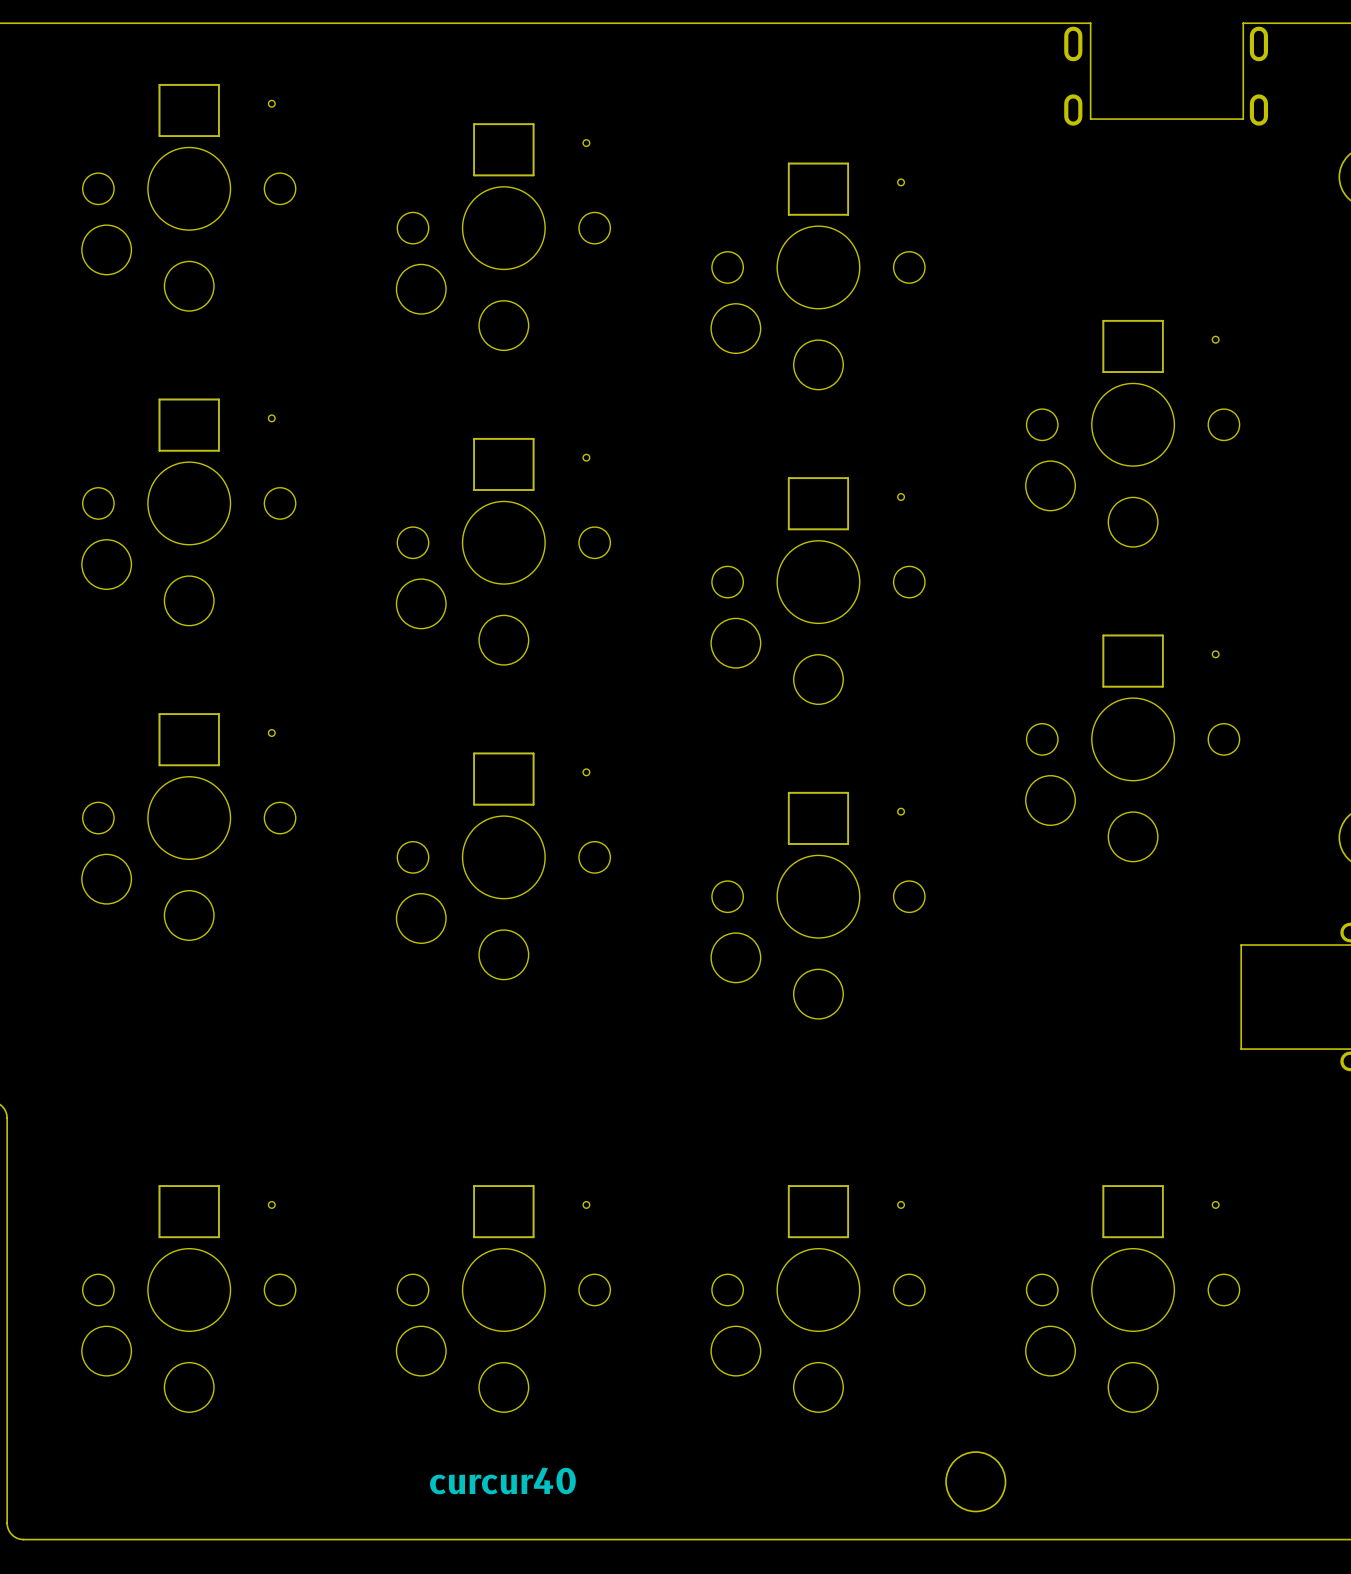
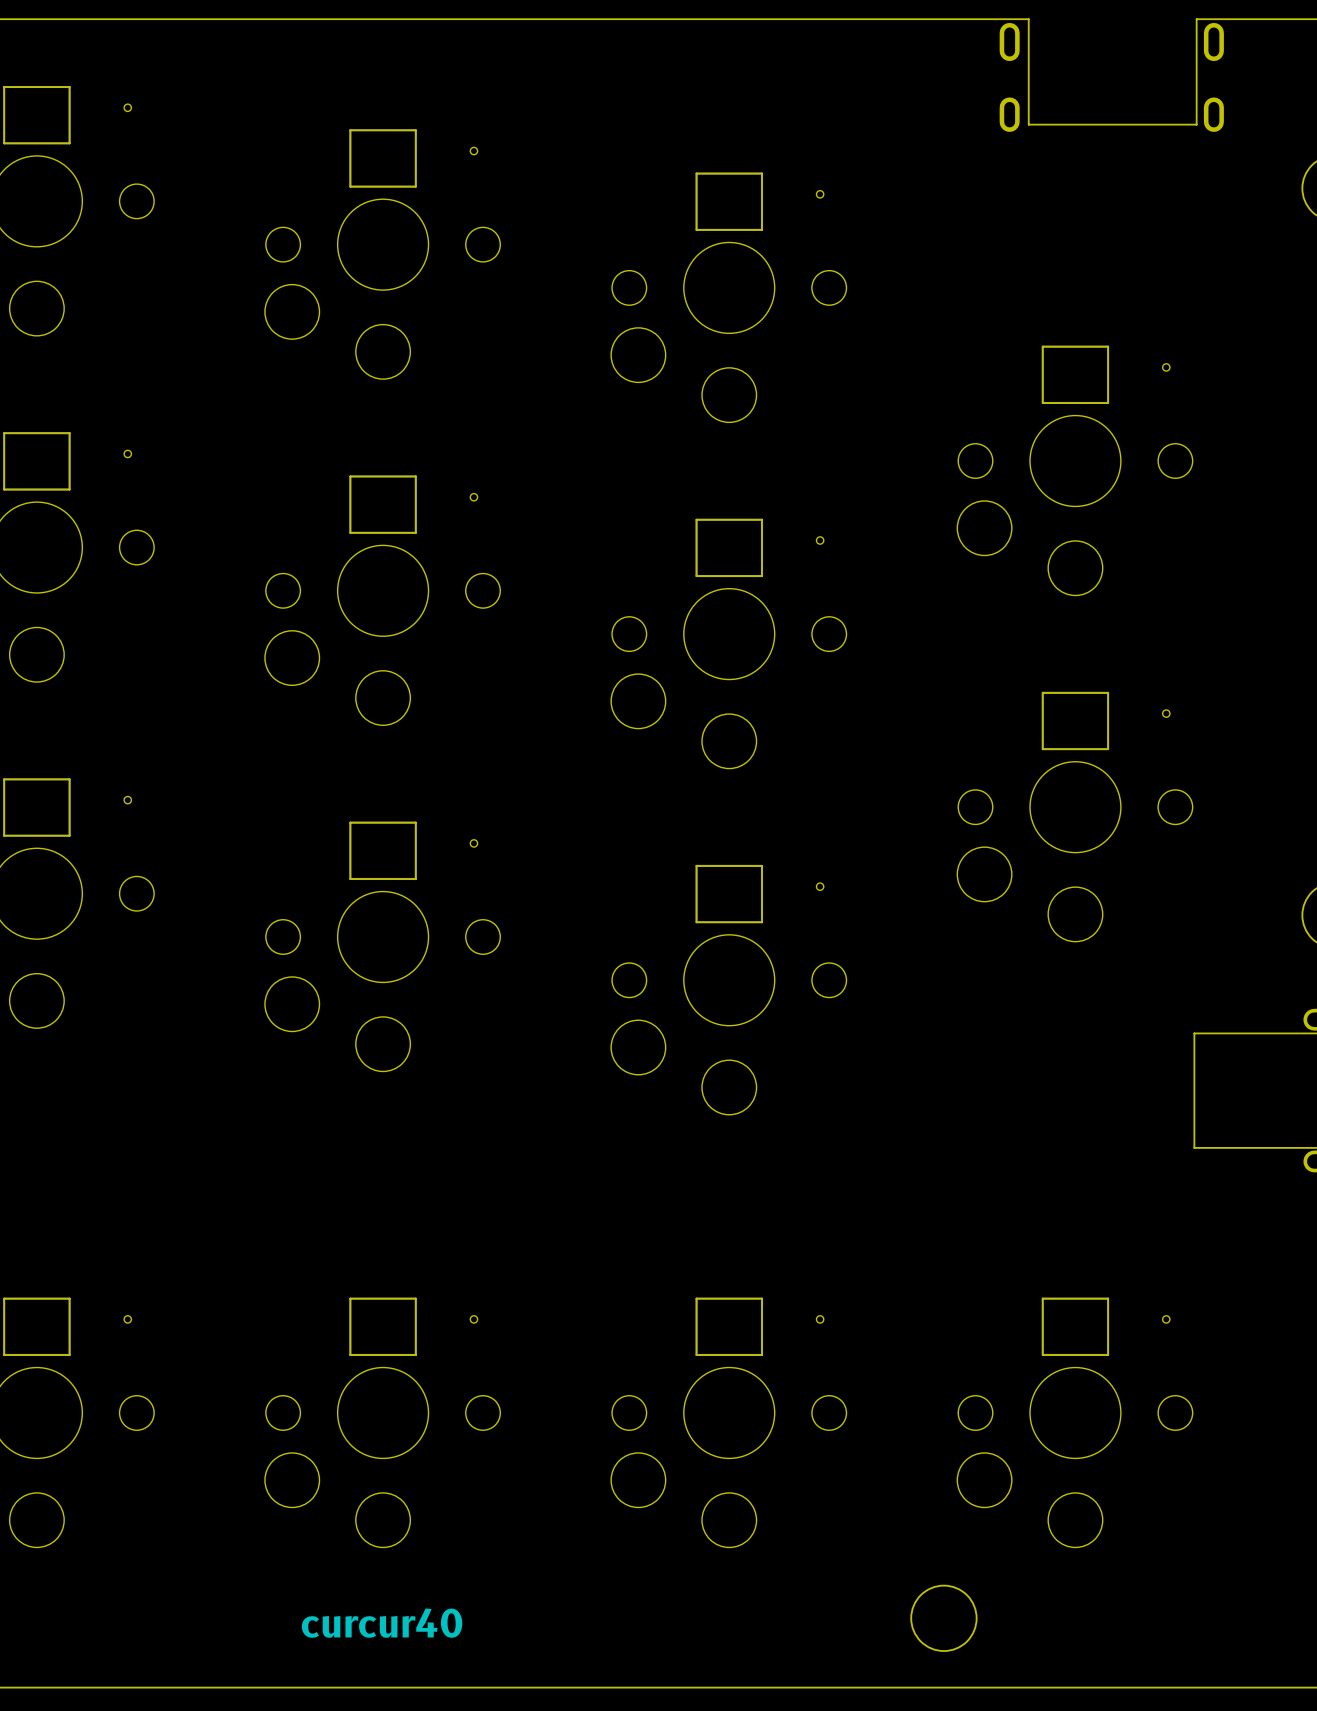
round board edge position: (975, 1481) -> (943, 1618)

